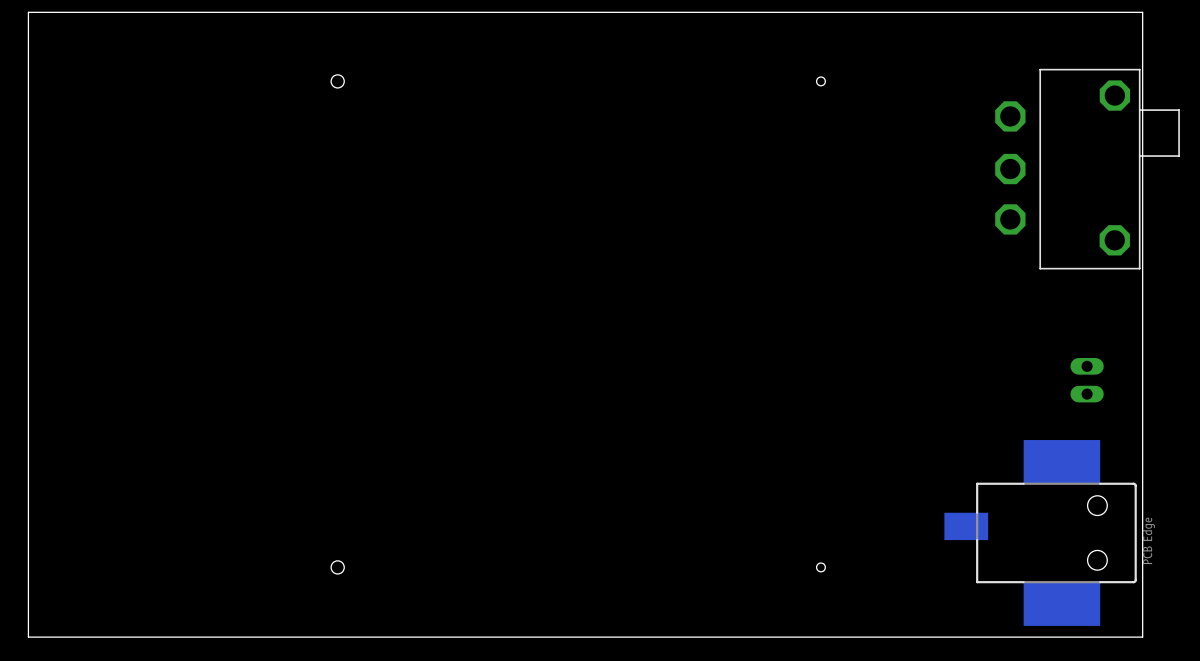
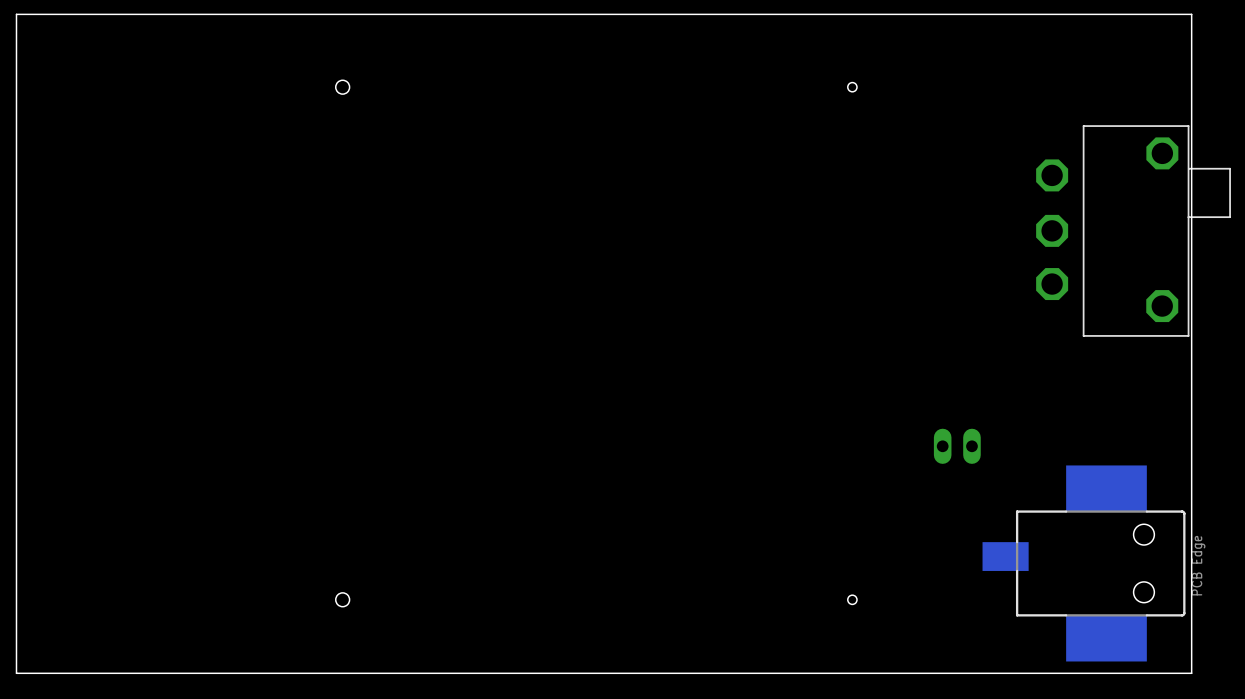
part position: (1087, 169) -> (1133, 230)
part rotation: 0° (1087, 380) -> 90° clockwise (957, 446)
part position: (1087, 380) -> (957, 446)

